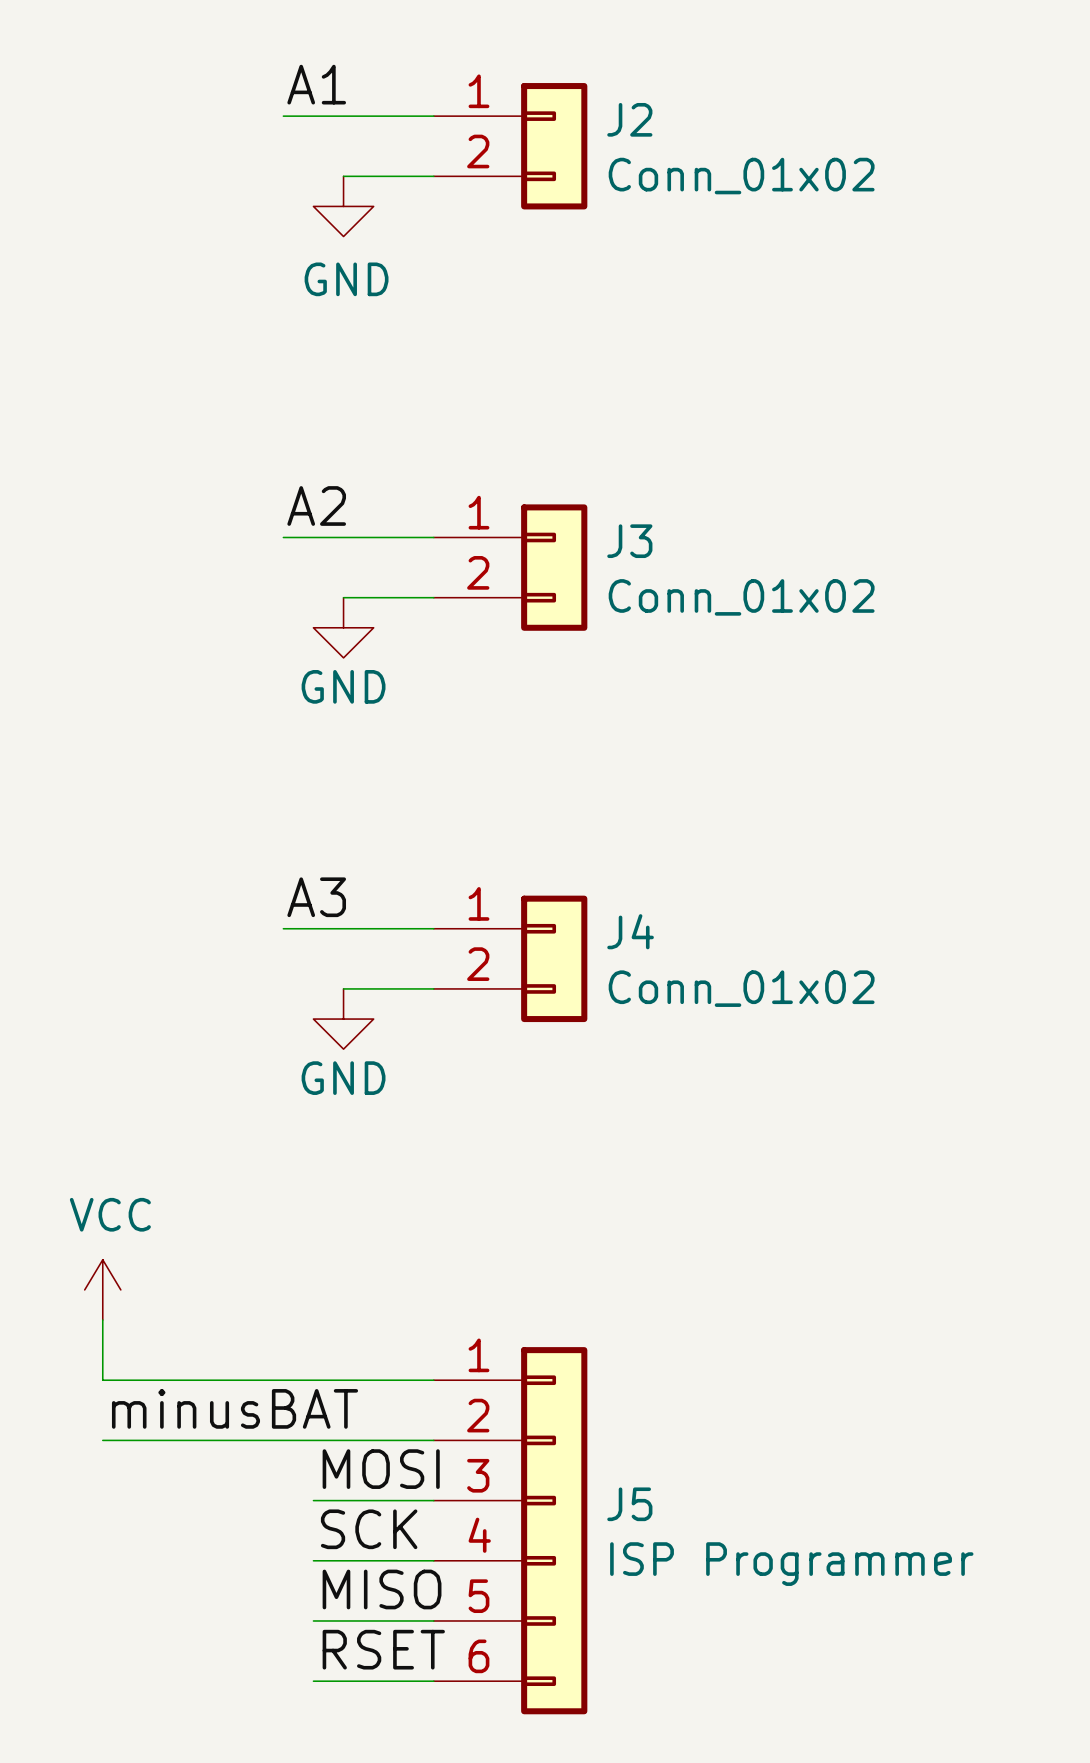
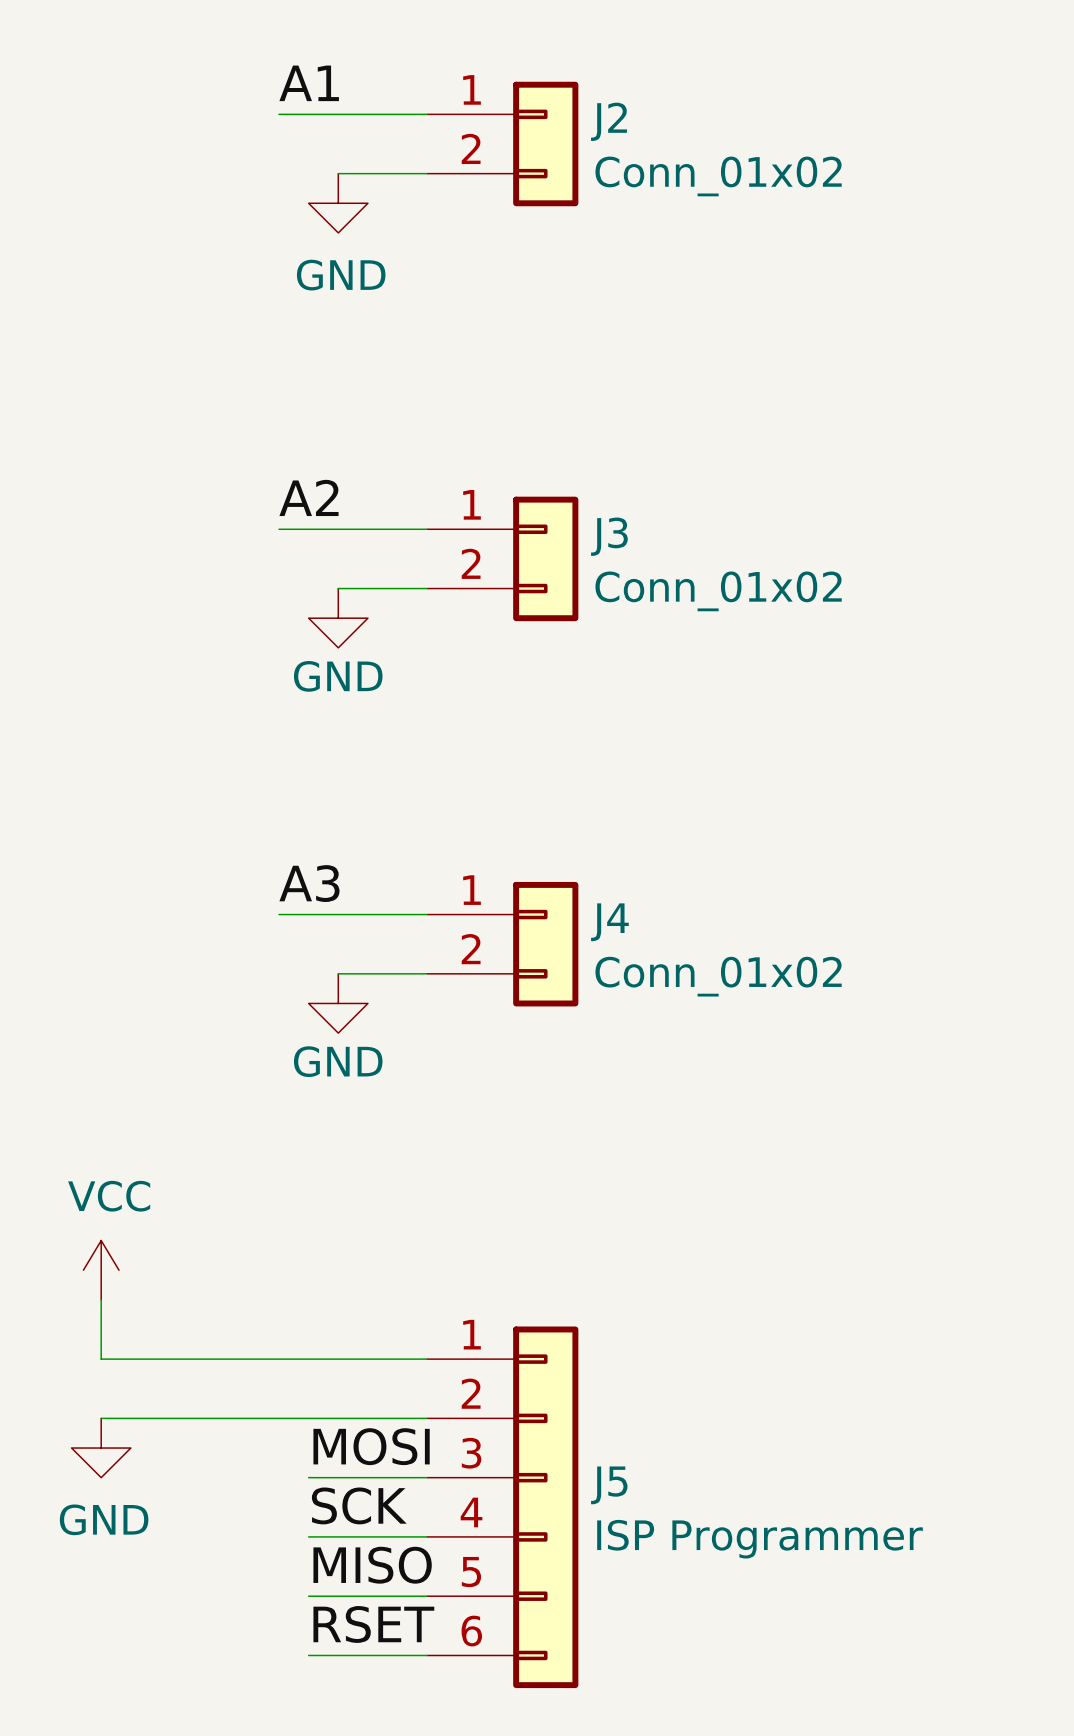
label: minusBAT (235, 1408) -> none
power symbol: none -> GND (101, 1448)

